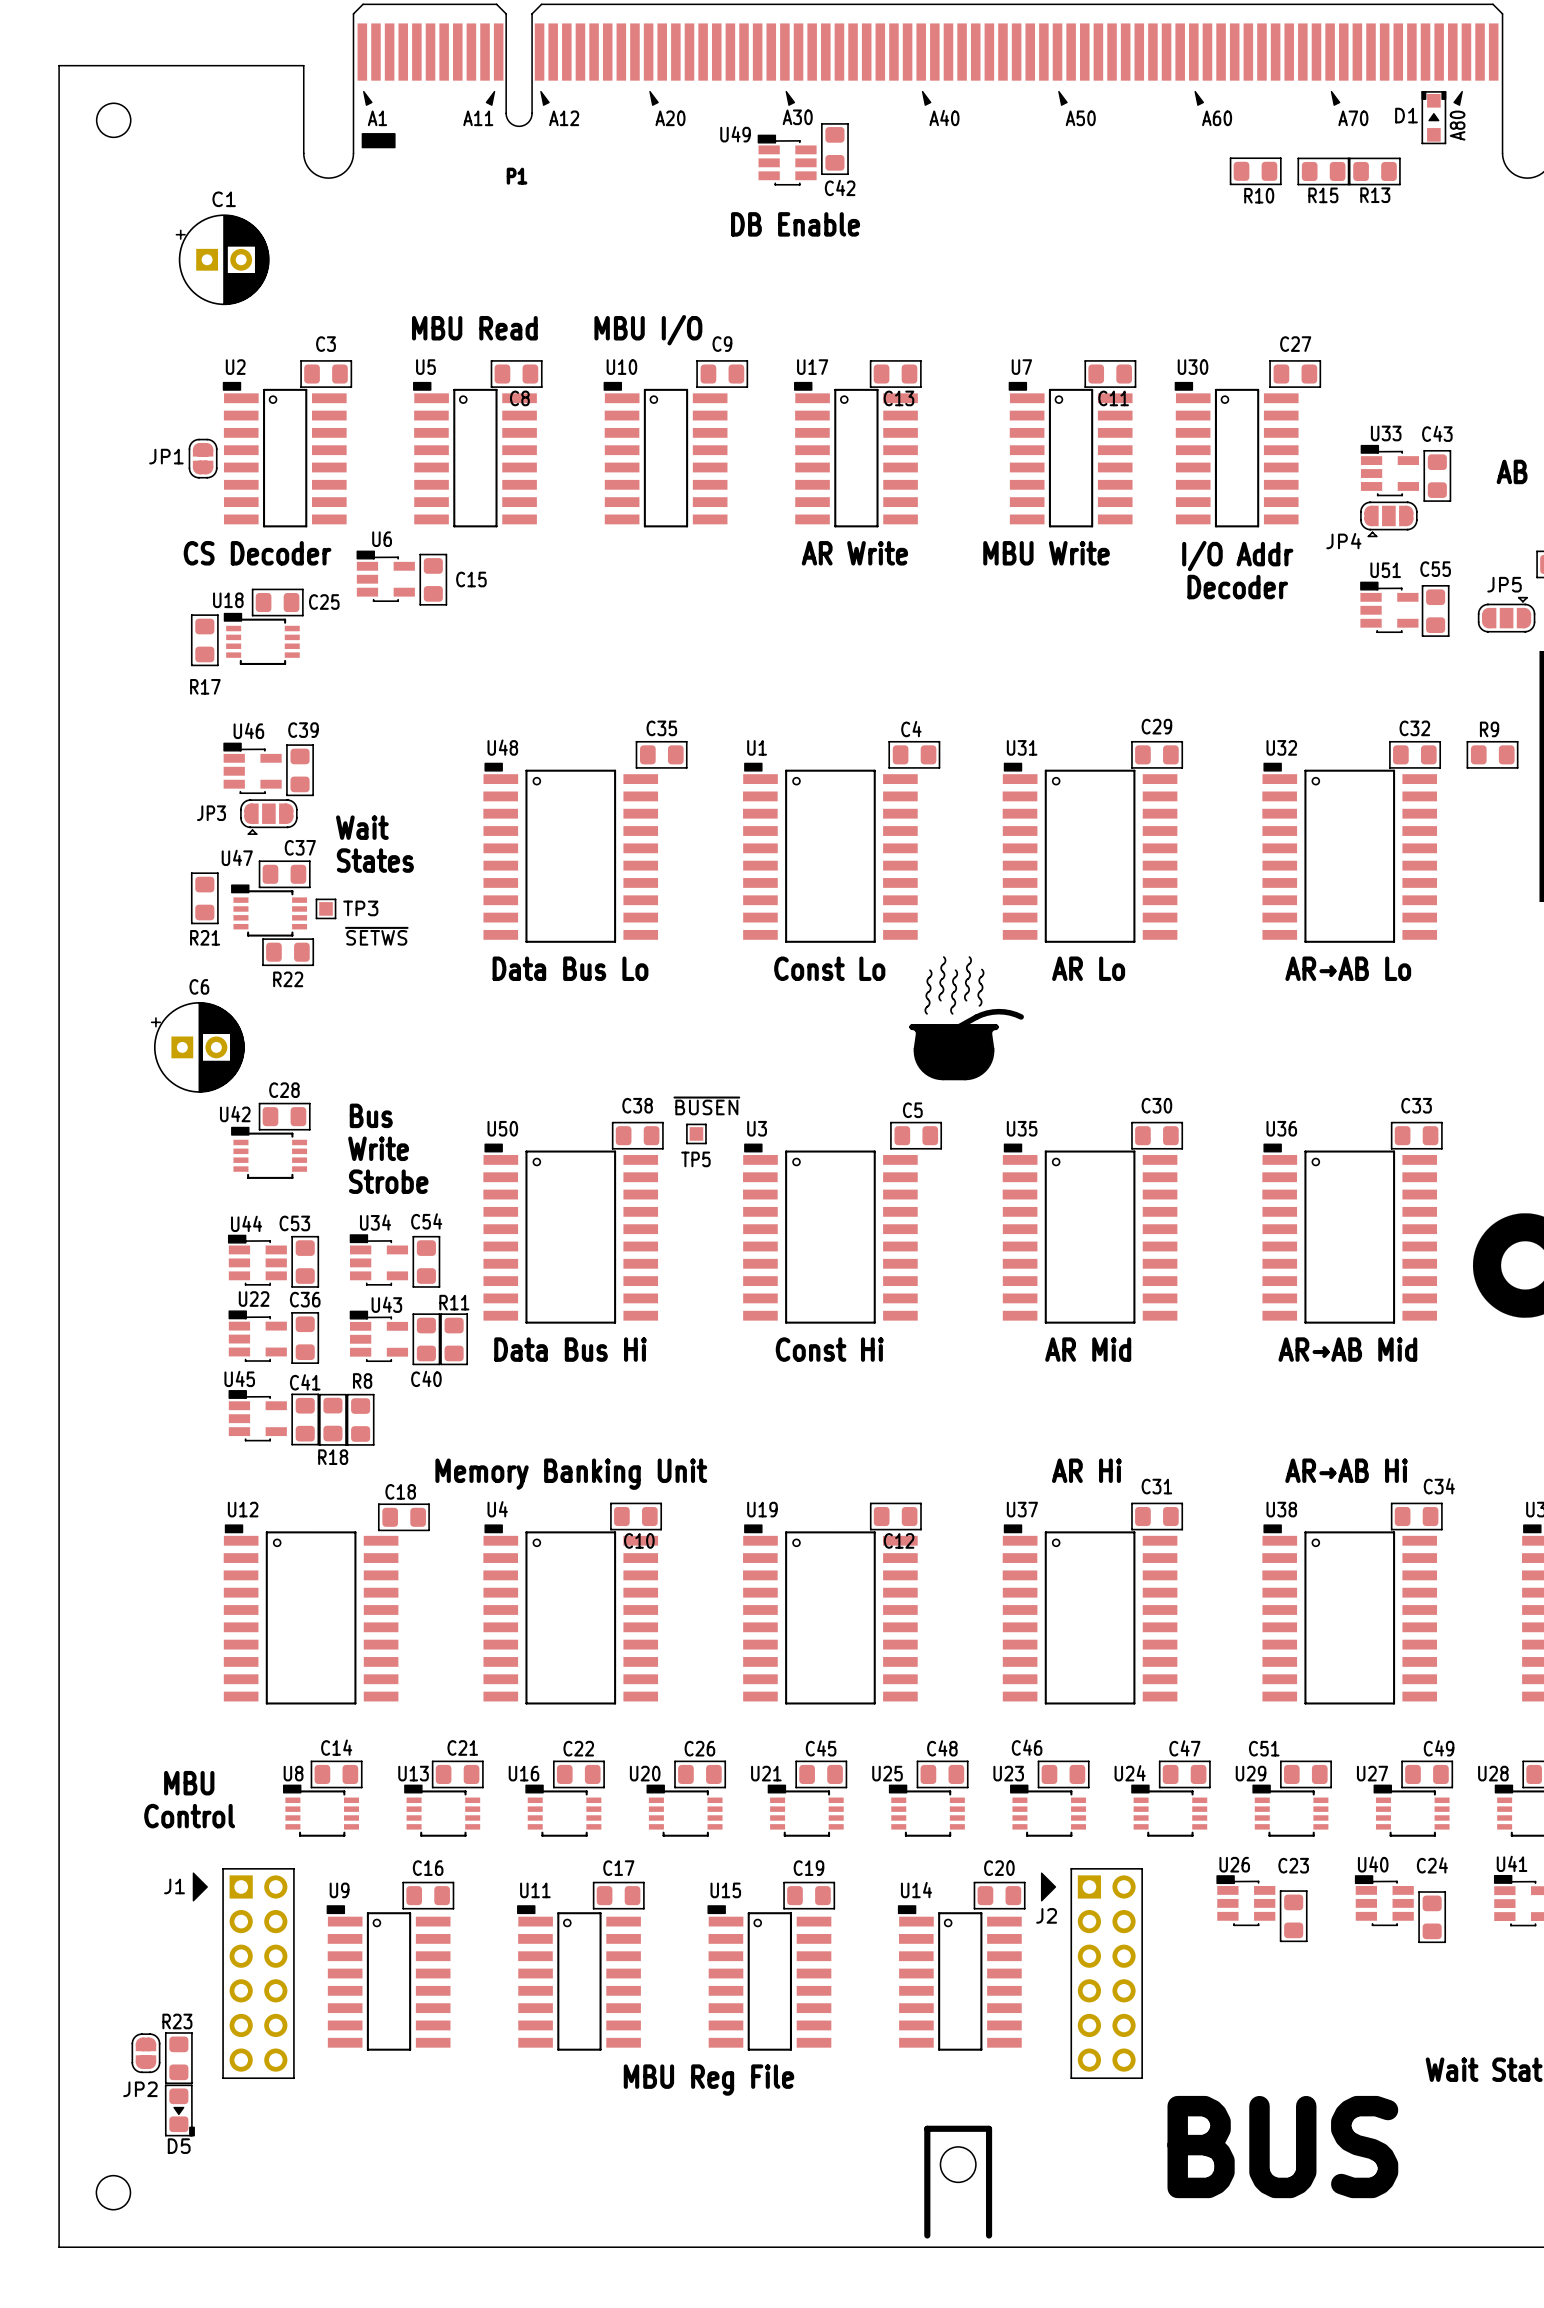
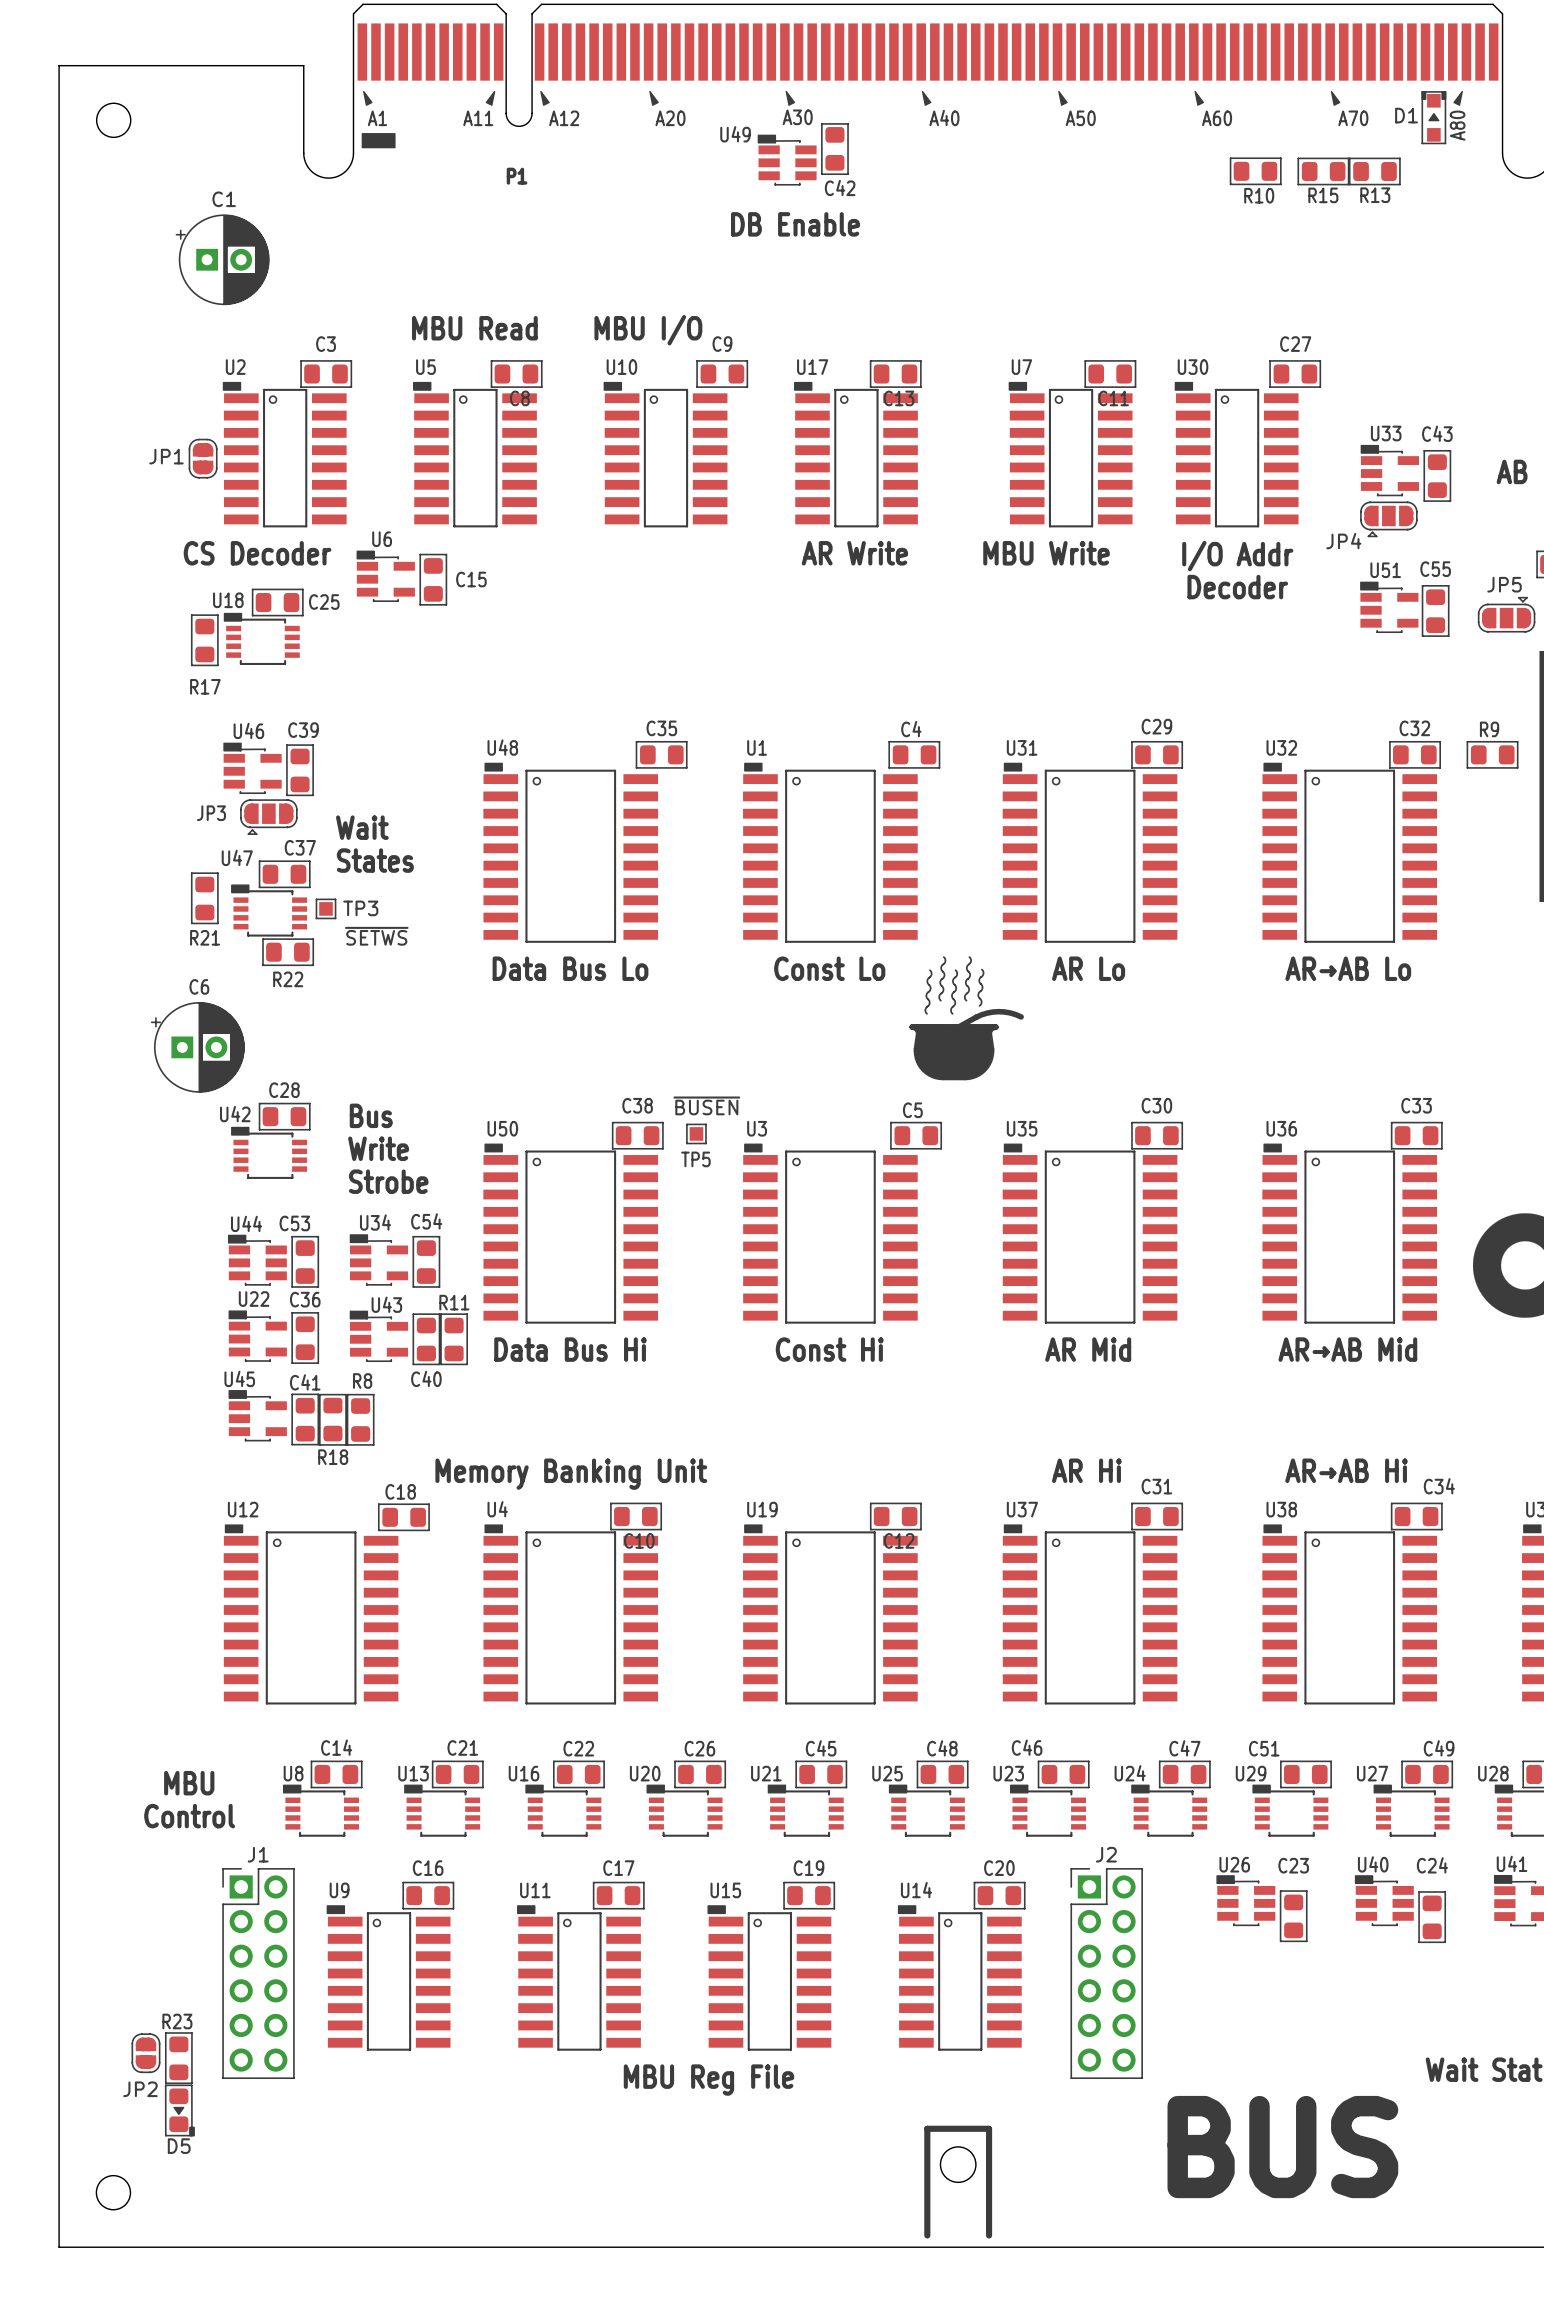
J1 footprint: [192, 1868, 295, 2080] -> [222, 1868, 295, 2080]
J2 footprint: [1040, 1868, 1143, 2080] -> [1070, 1868, 1143, 2080]
J1 name position: J1 (174, 1886) -> J1 (258, 1854)
J2 name position: J2 (1046, 1915) -> J2 (1106, 1854)

